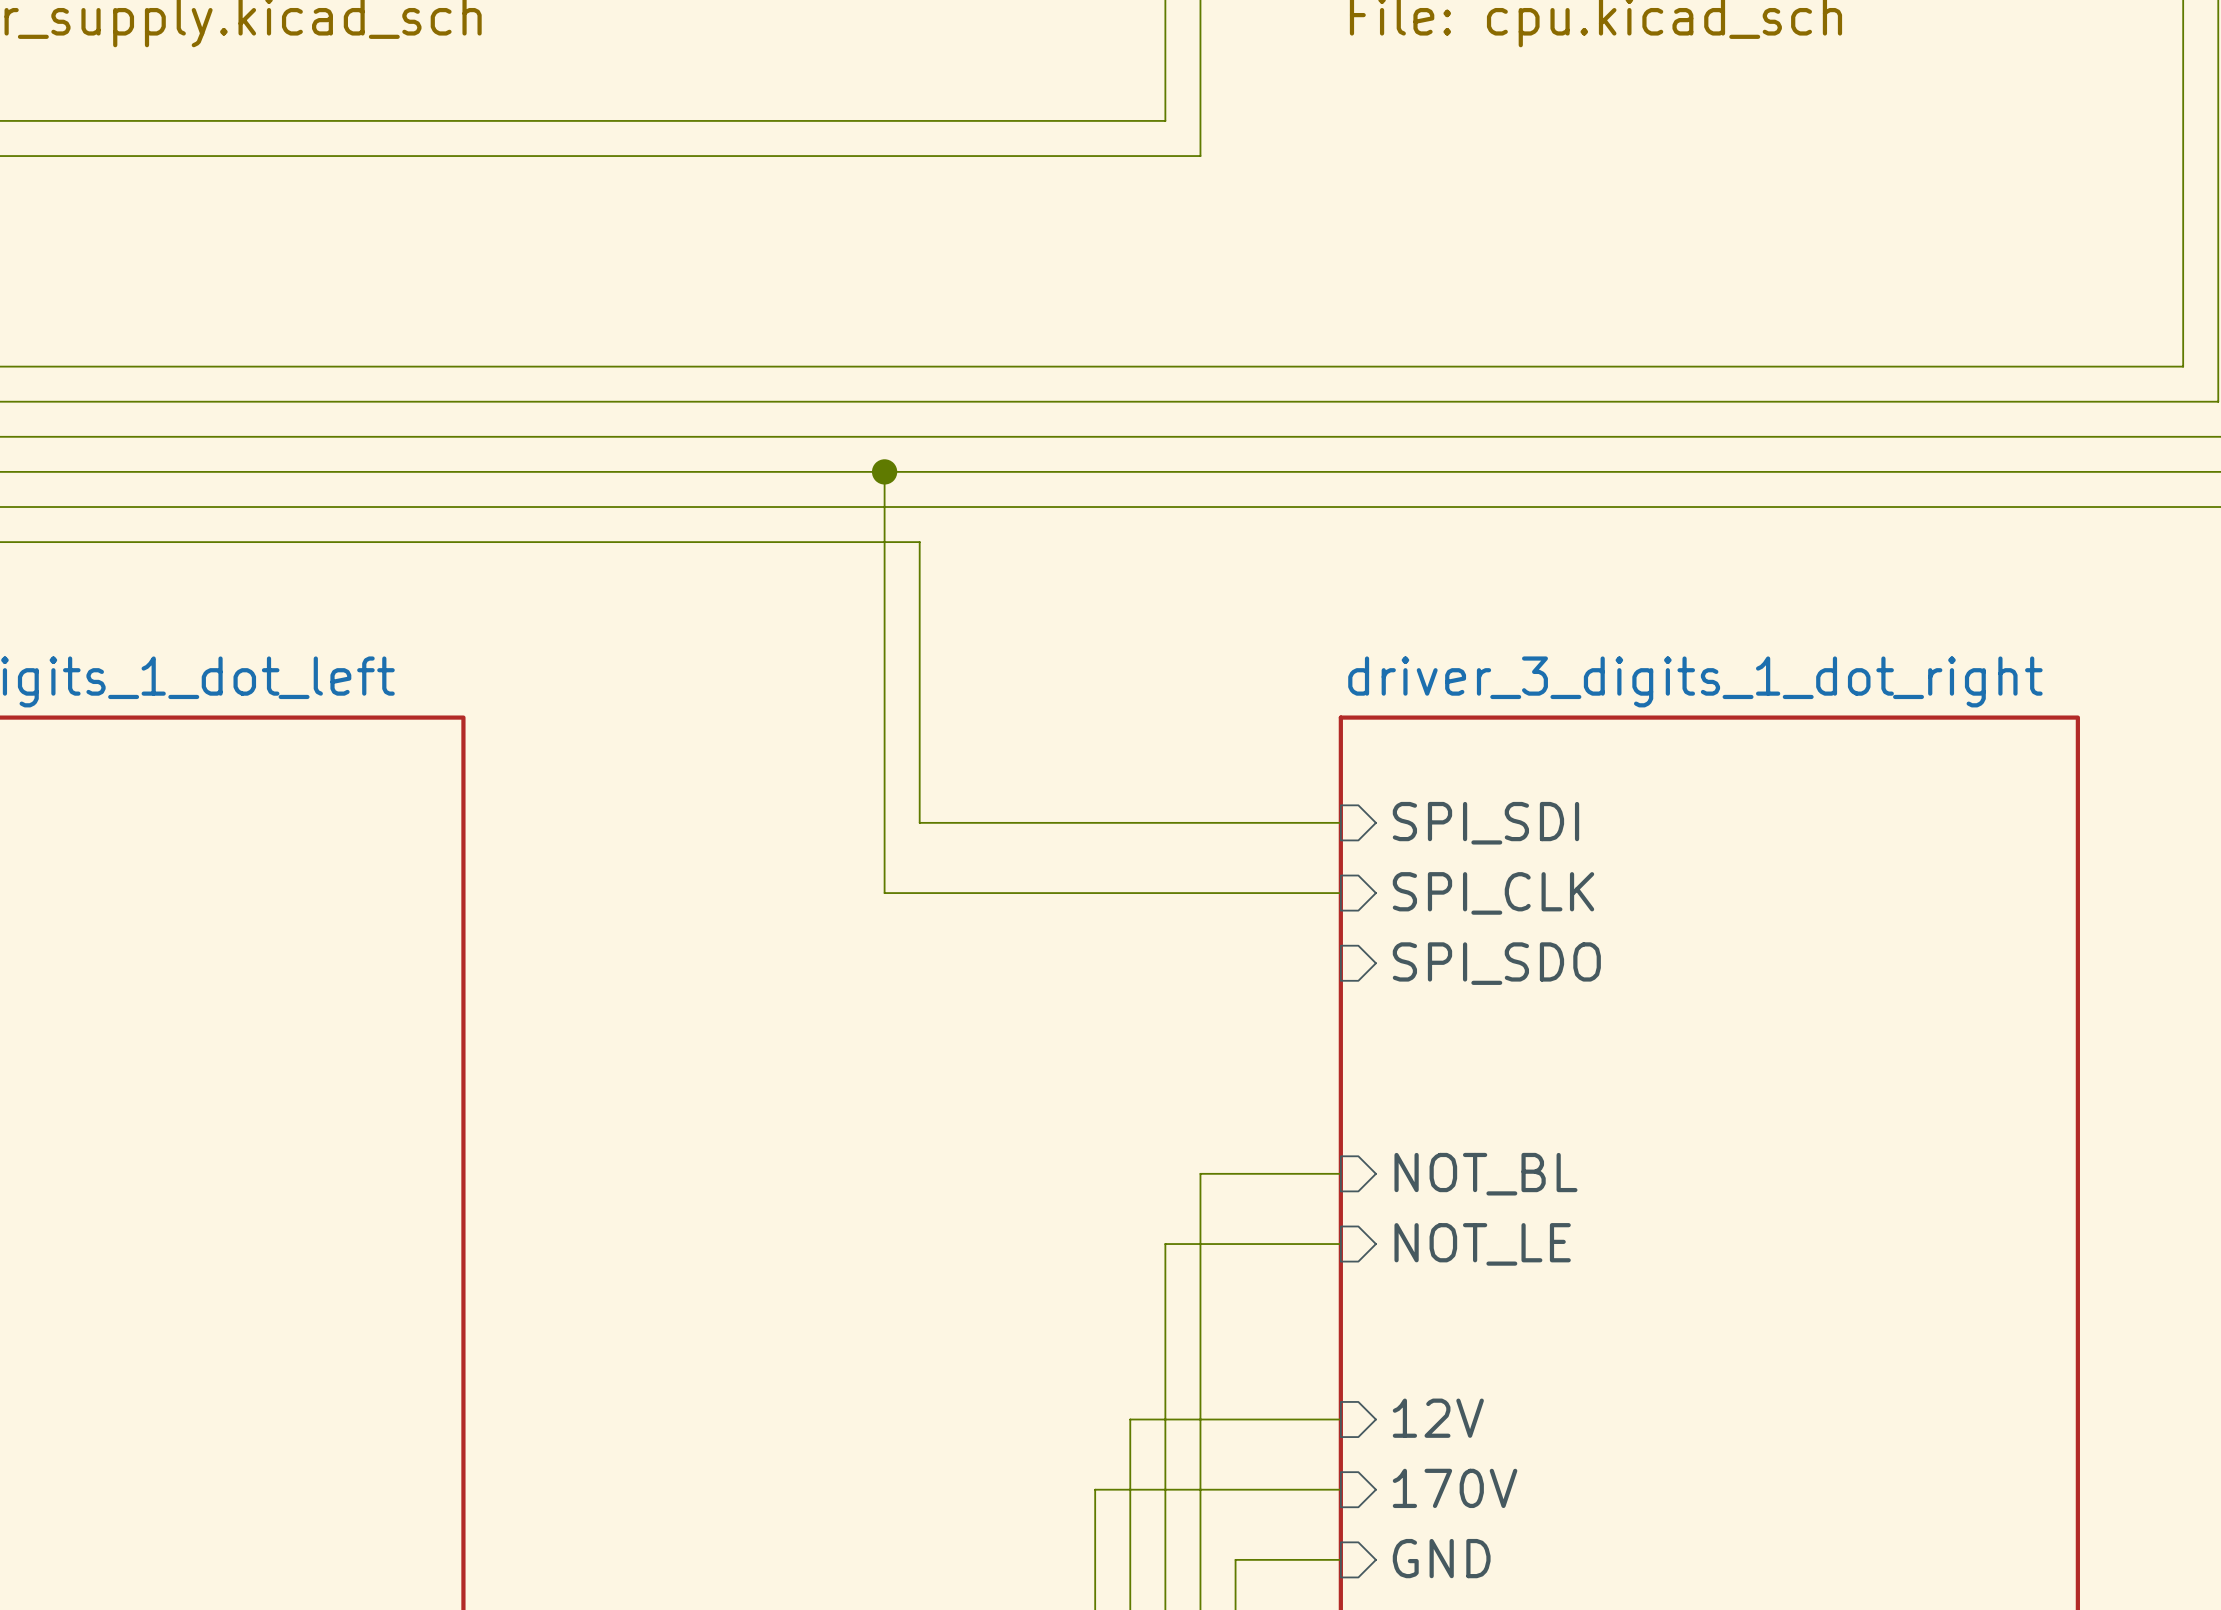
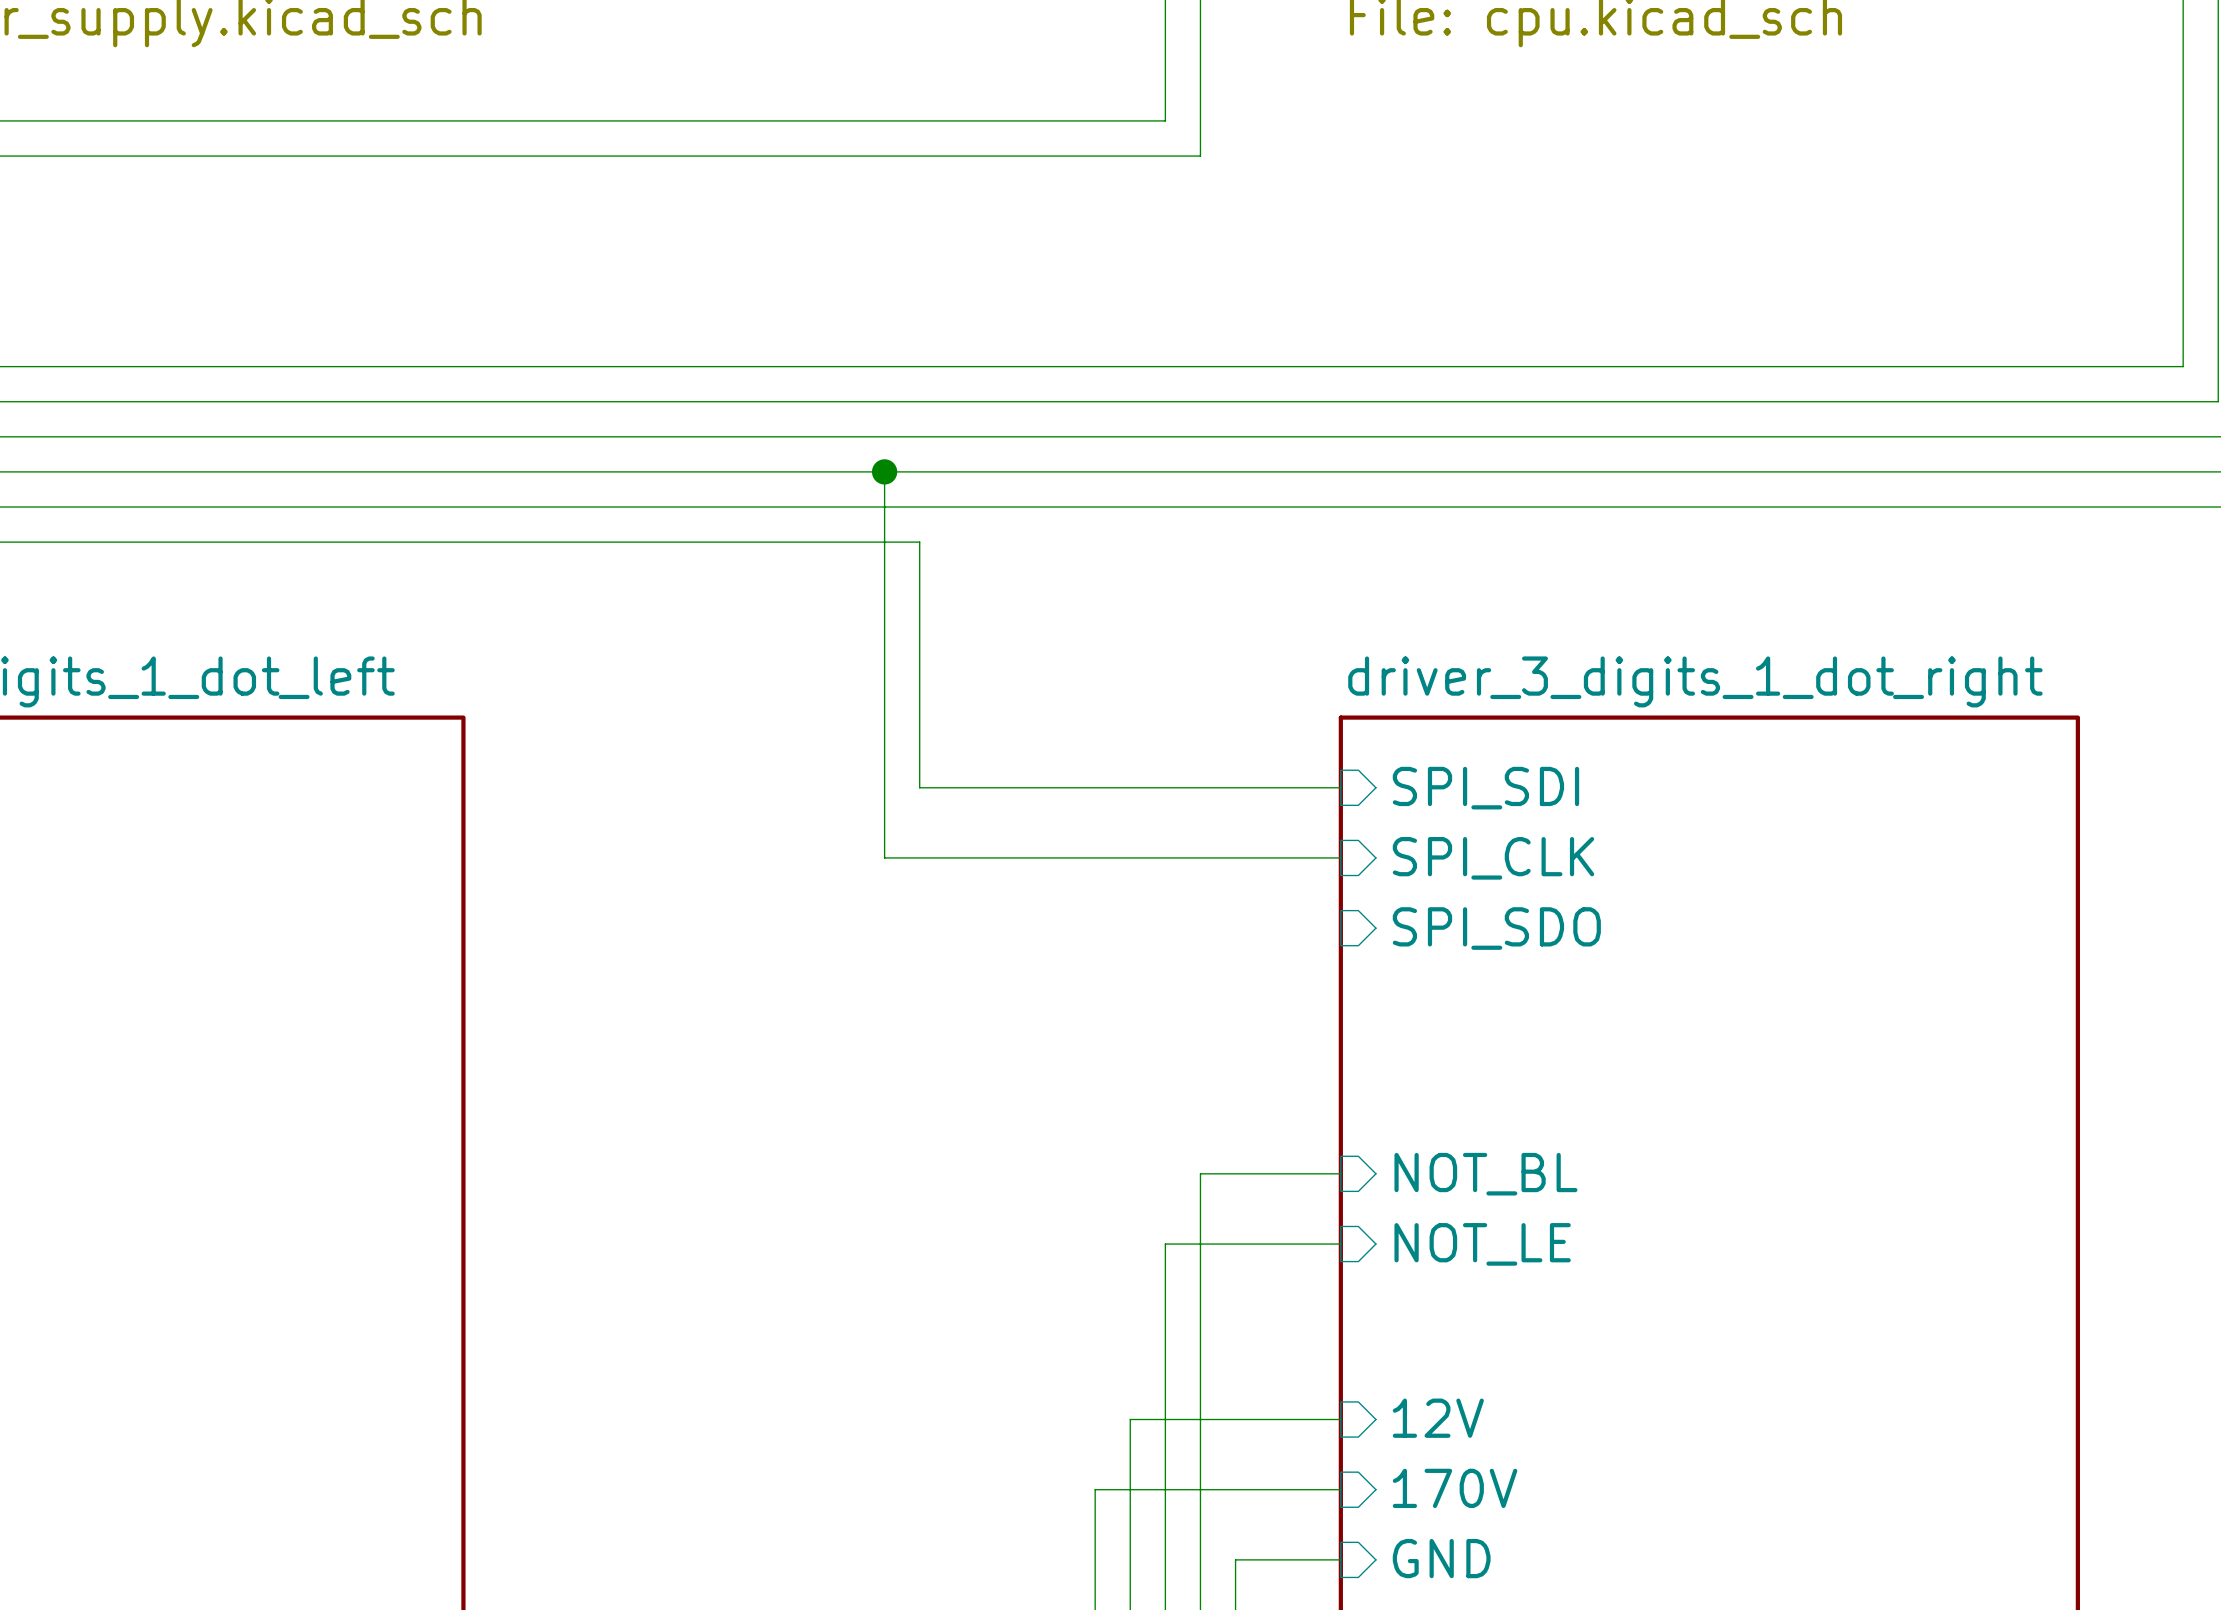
wire: (919, 787) (919, 822) (1340, 822) -> (919, 787) (1340, 787)
sheet pin position: SPI_SDI (1485, 823) -> SPI_SDI (1485, 788)
wire: (884, 857) (884, 893) (1340, 893) -> (884, 857) (1340, 857)
sheet pin position: SPI_CLK (1493, 893) -> SPI_CLK (1493, 858)
sheet pin position: SPI_SDO (1496, 963) -> SPI_SDO (1496, 928)

